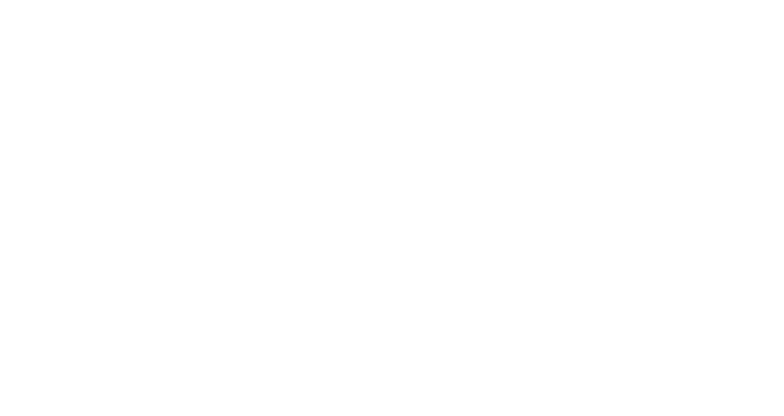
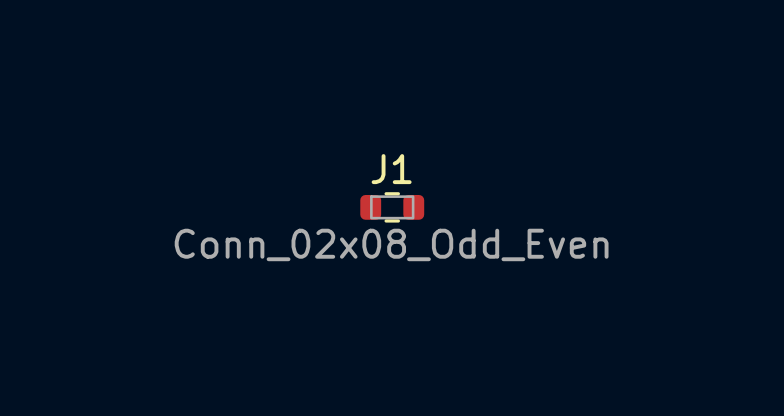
J1: none -> Conn_02x08_Odd_Even (392, 207)

